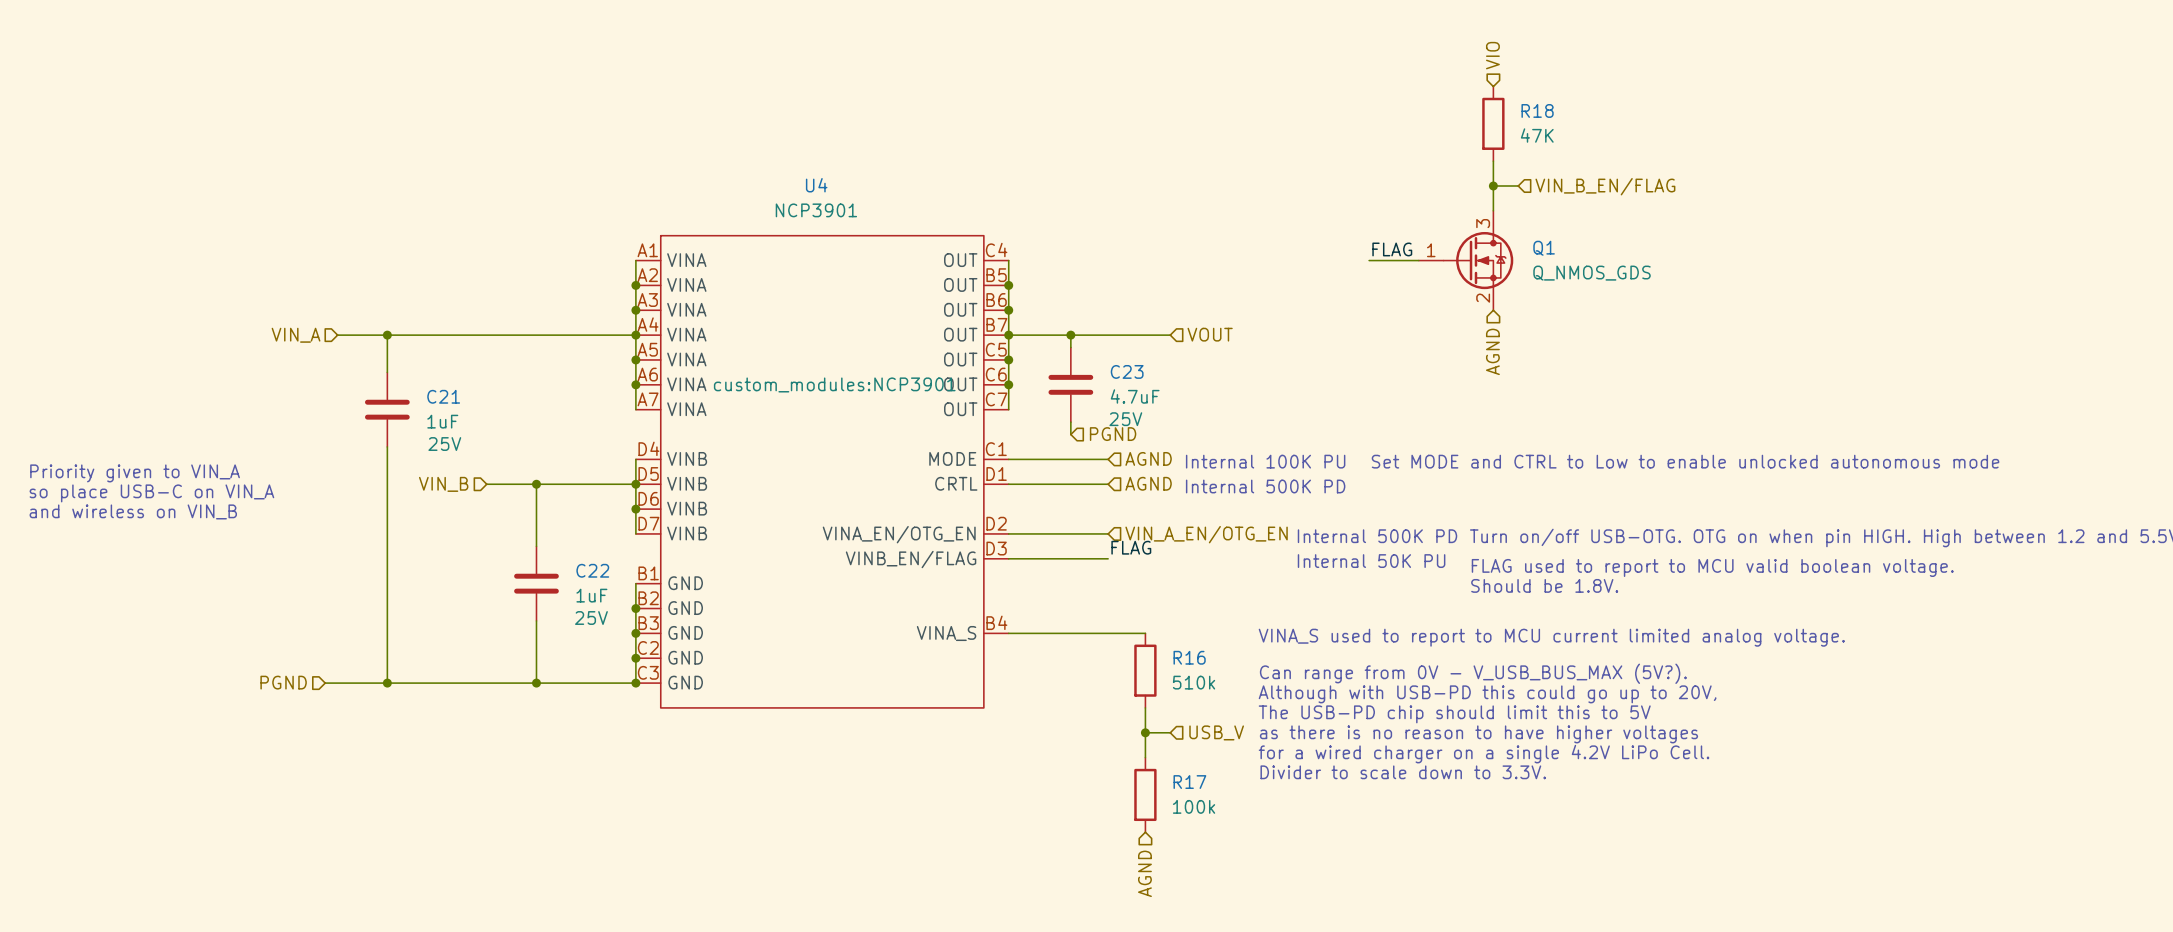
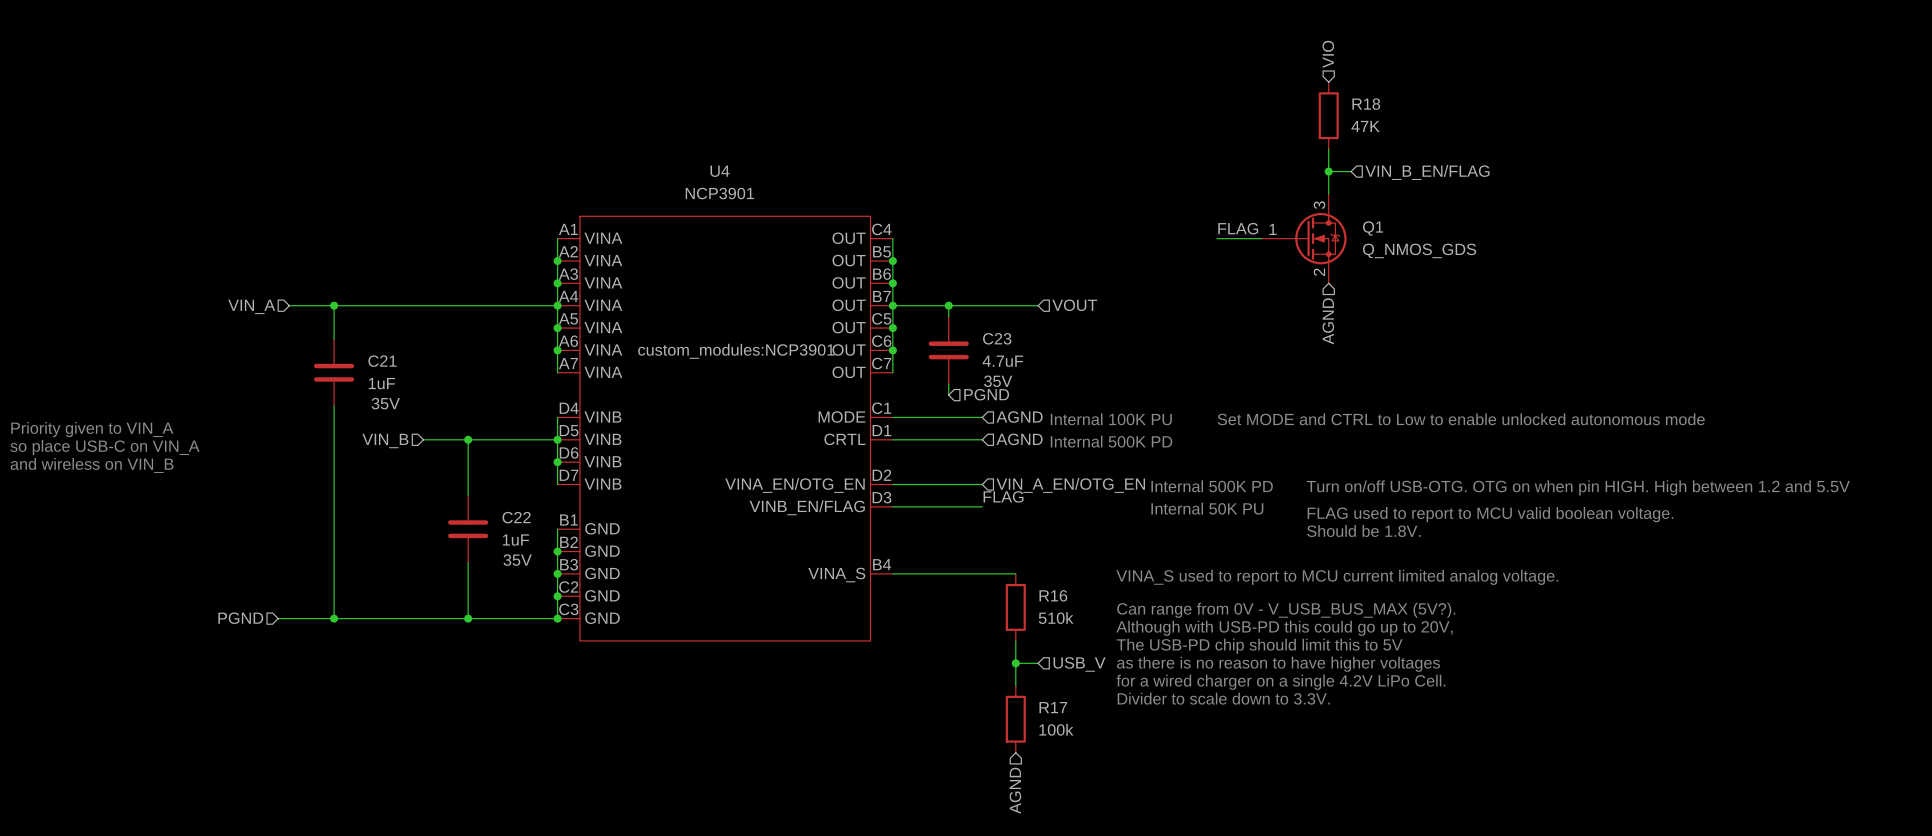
C23 text: 25V (1125, 419) -> 35V (998, 381)
C21 text: 25V (444, 444) -> 35V (385, 403)
C22 text: 25V (591, 618) -> 35V (517, 560)

